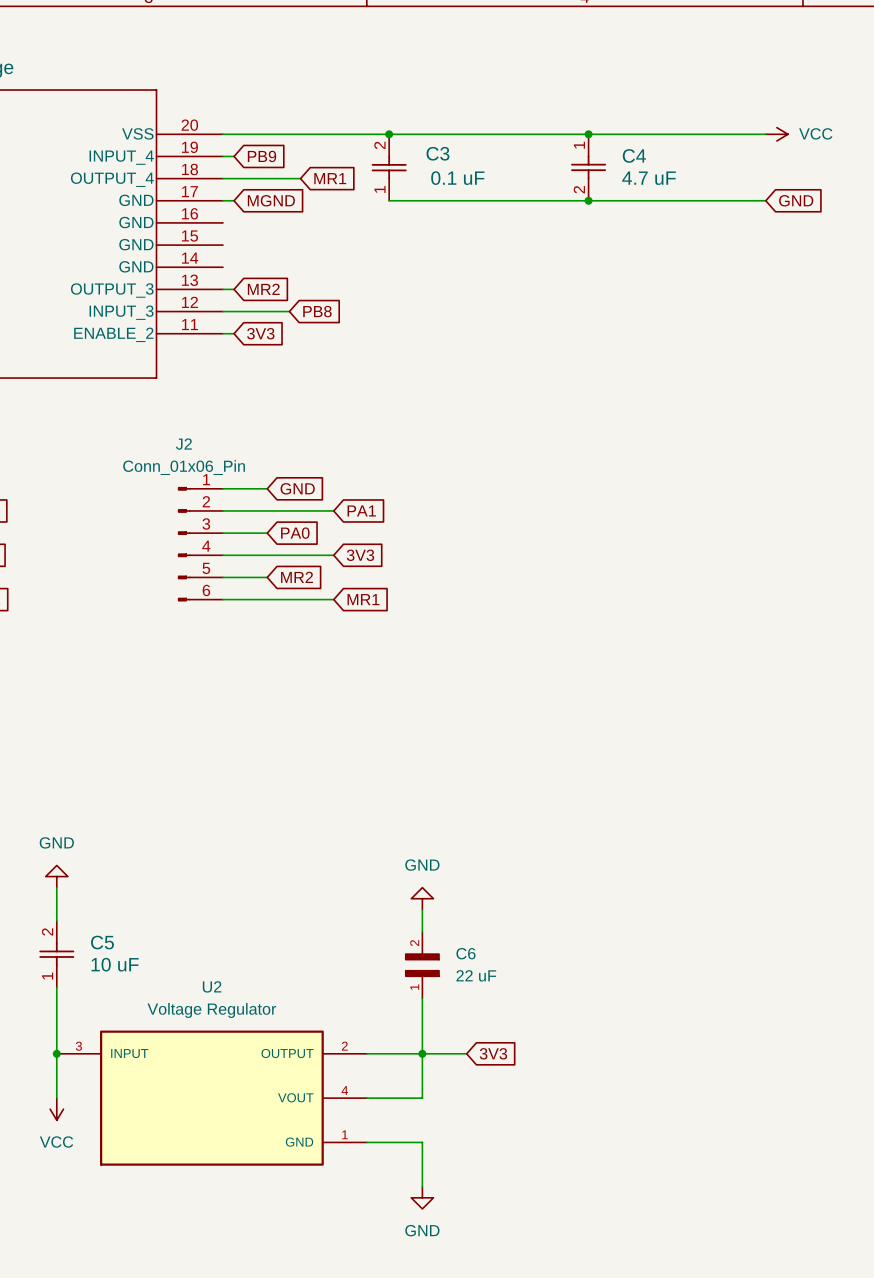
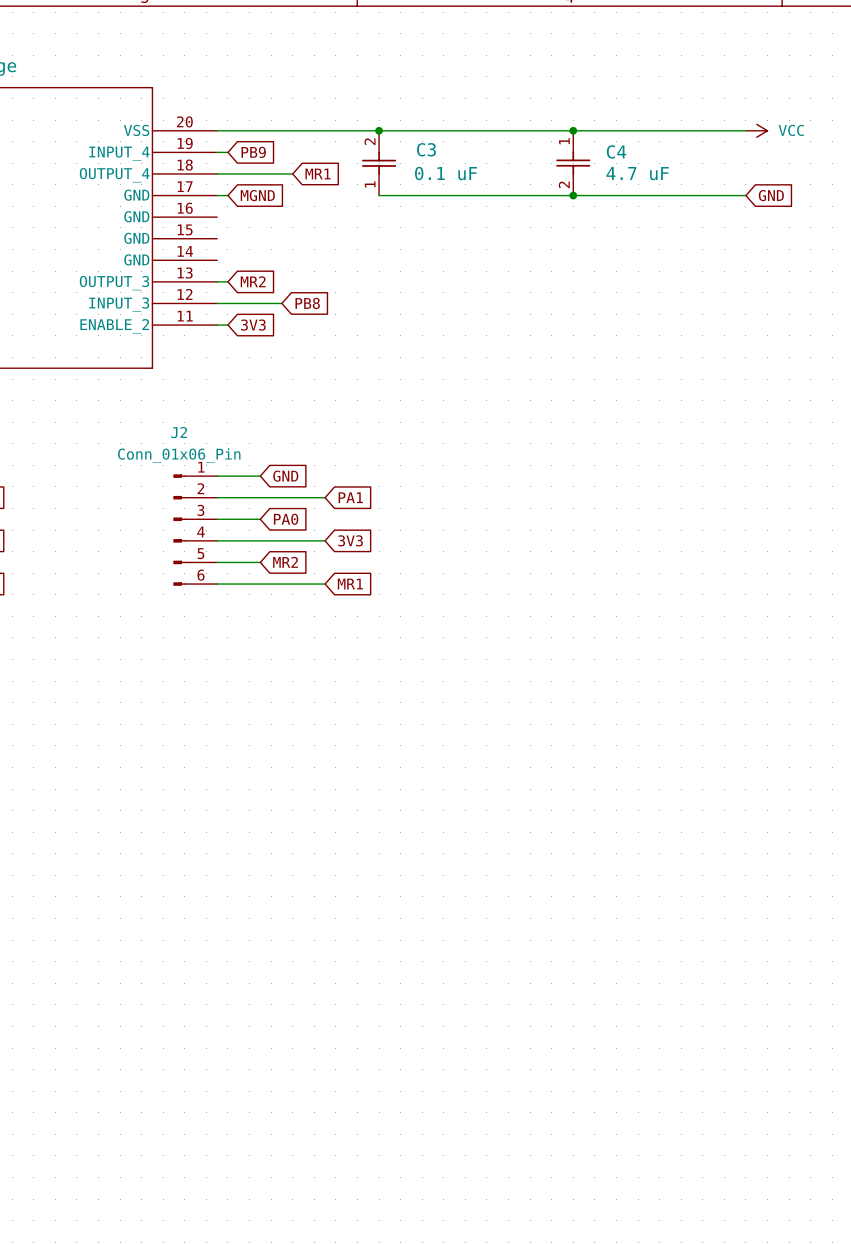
power symbol: GND (56, 876) -> none
wire: (56, 887) (56, 920) -> none
power symbol: GND (422, 898) -> none
wire: (422, 909) (422, 931) -> none
C5: 10 uF (56, 954) -> none
C6: 22 uF (422, 965) -> none
wire: (56, 987) (56, 1098) -> none
wire: (422, 998) (422, 1098) (367, 1098) -> none
junction: (56, 1053) -> none
wire: (367, 1053) (466, 1053) -> none
junction: (422, 1053) -> none
global label: 3V3 (493, 1053) -> none
U2: Voltage Regulator (211, 1098) -> none
power symbol: VCC (56, 1109) -> none
wire: (367, 1142) (422, 1142) (422, 1186) -> none
power symbol: GND (422, 1197) -> none

